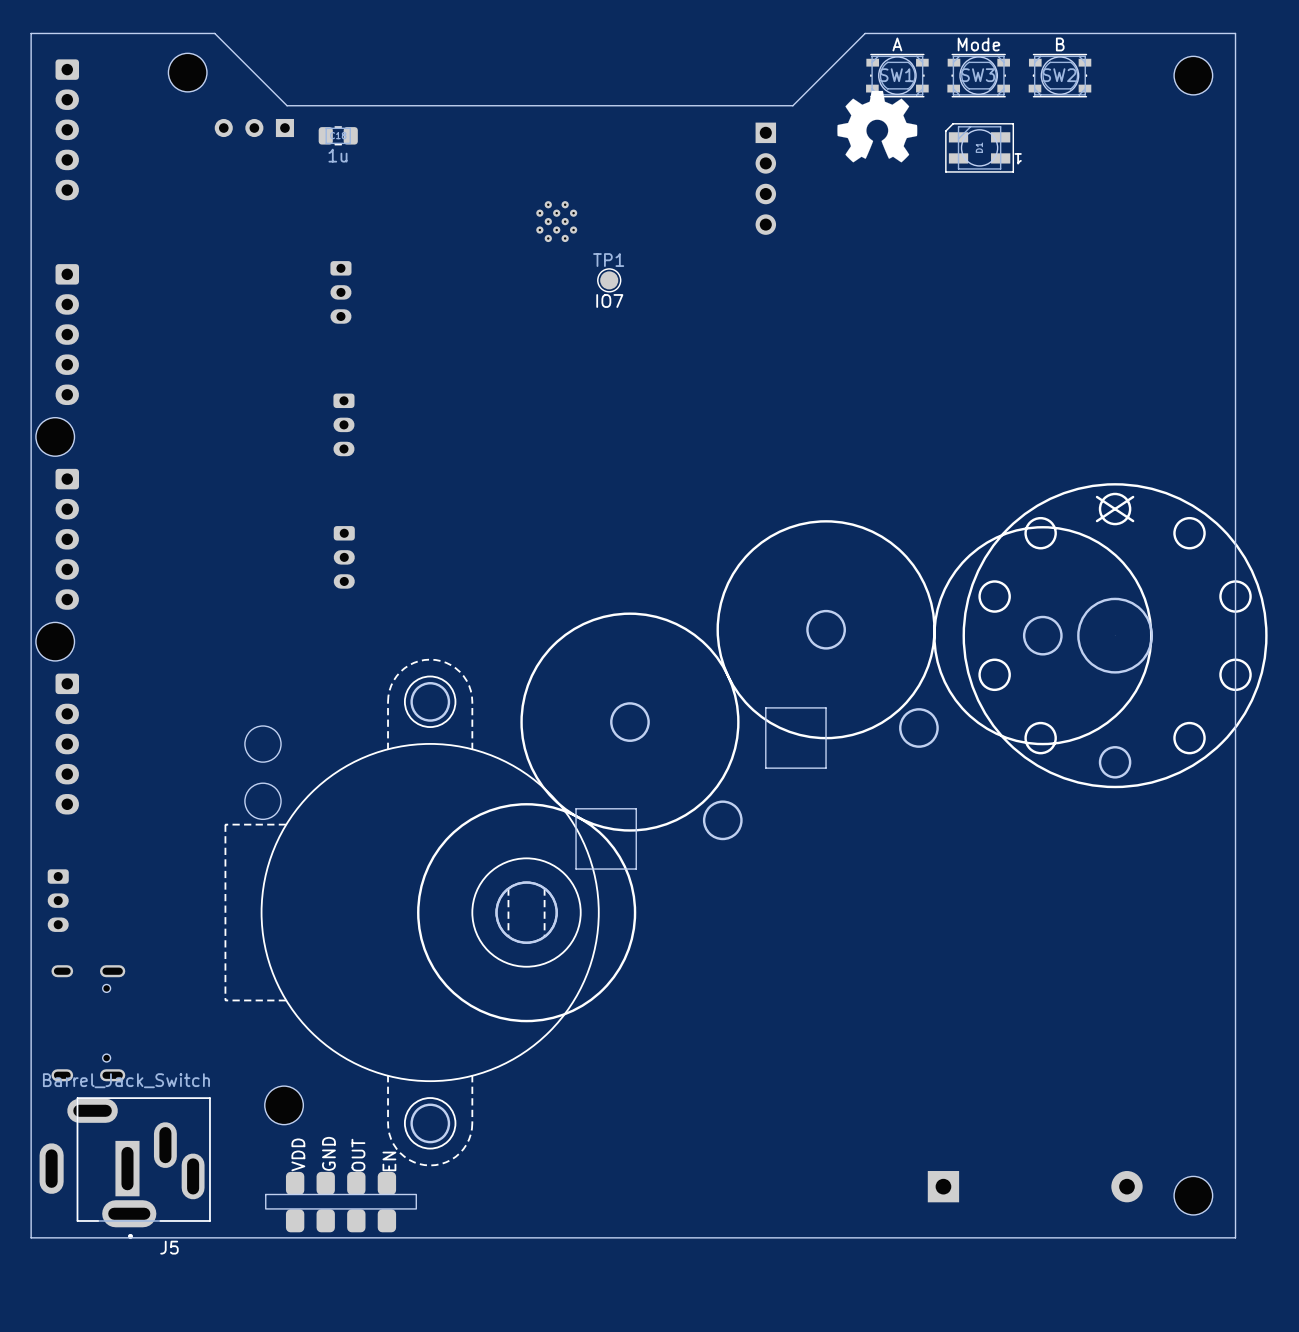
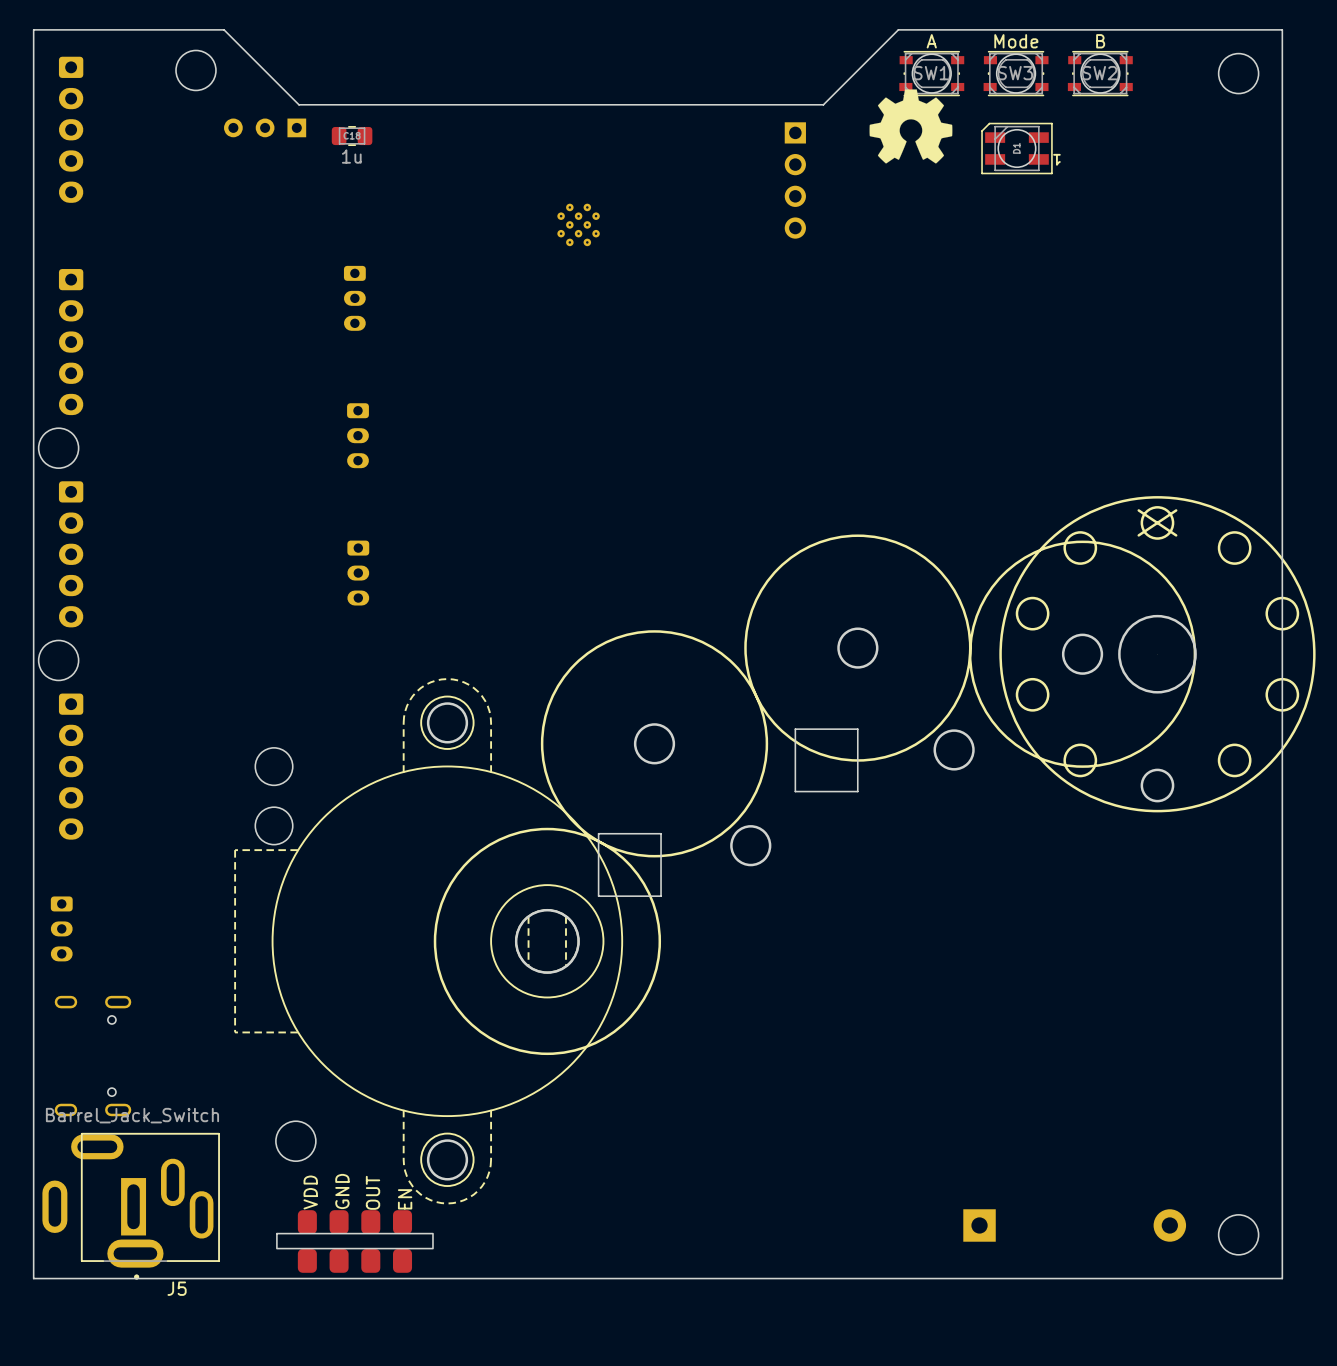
TP1: IO7 (609, 280) -> none

